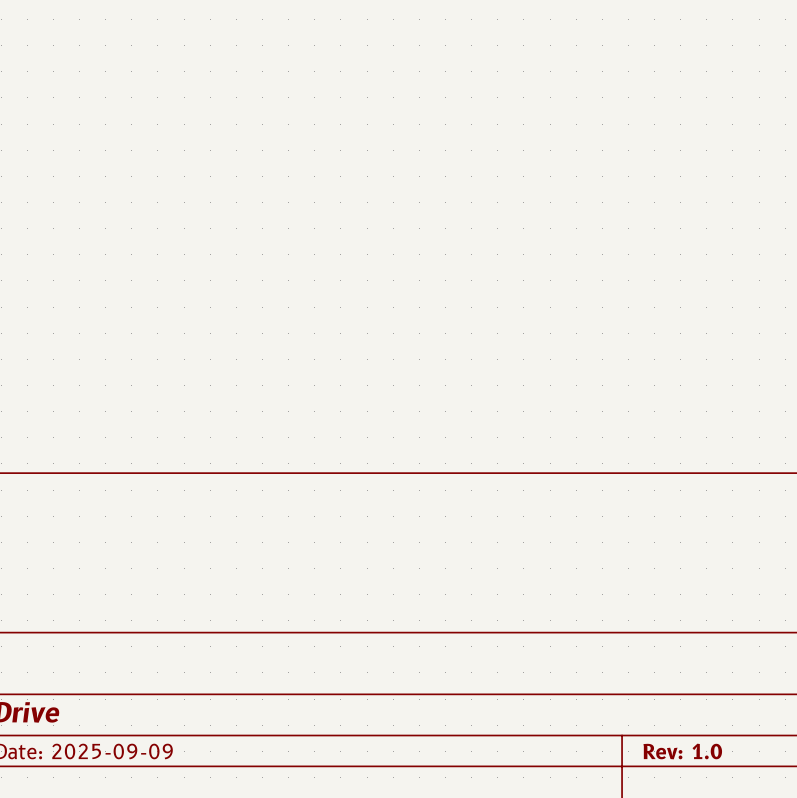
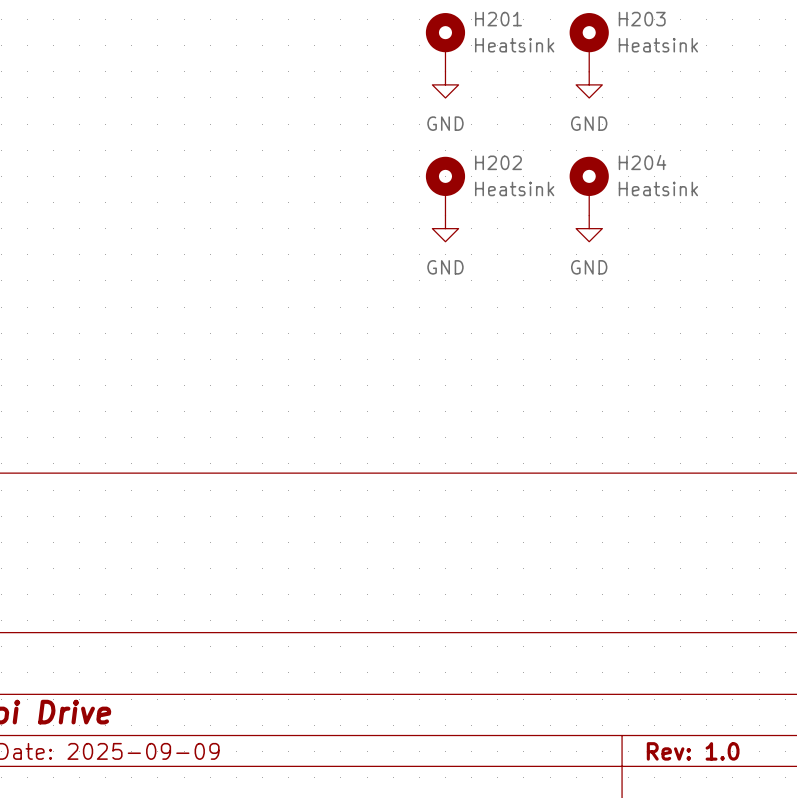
H201: none -> Heatsink (445, 42)
H203: none -> Heatsink (589, 42)
power symbol: none -> GND (445, 84)
power symbol: none -> GND (589, 84)
H202: none -> Heatsink (445, 186)
H204: none -> Heatsink (589, 186)
power symbol: none -> GND (445, 228)
power symbol: none -> GND (589, 228)

